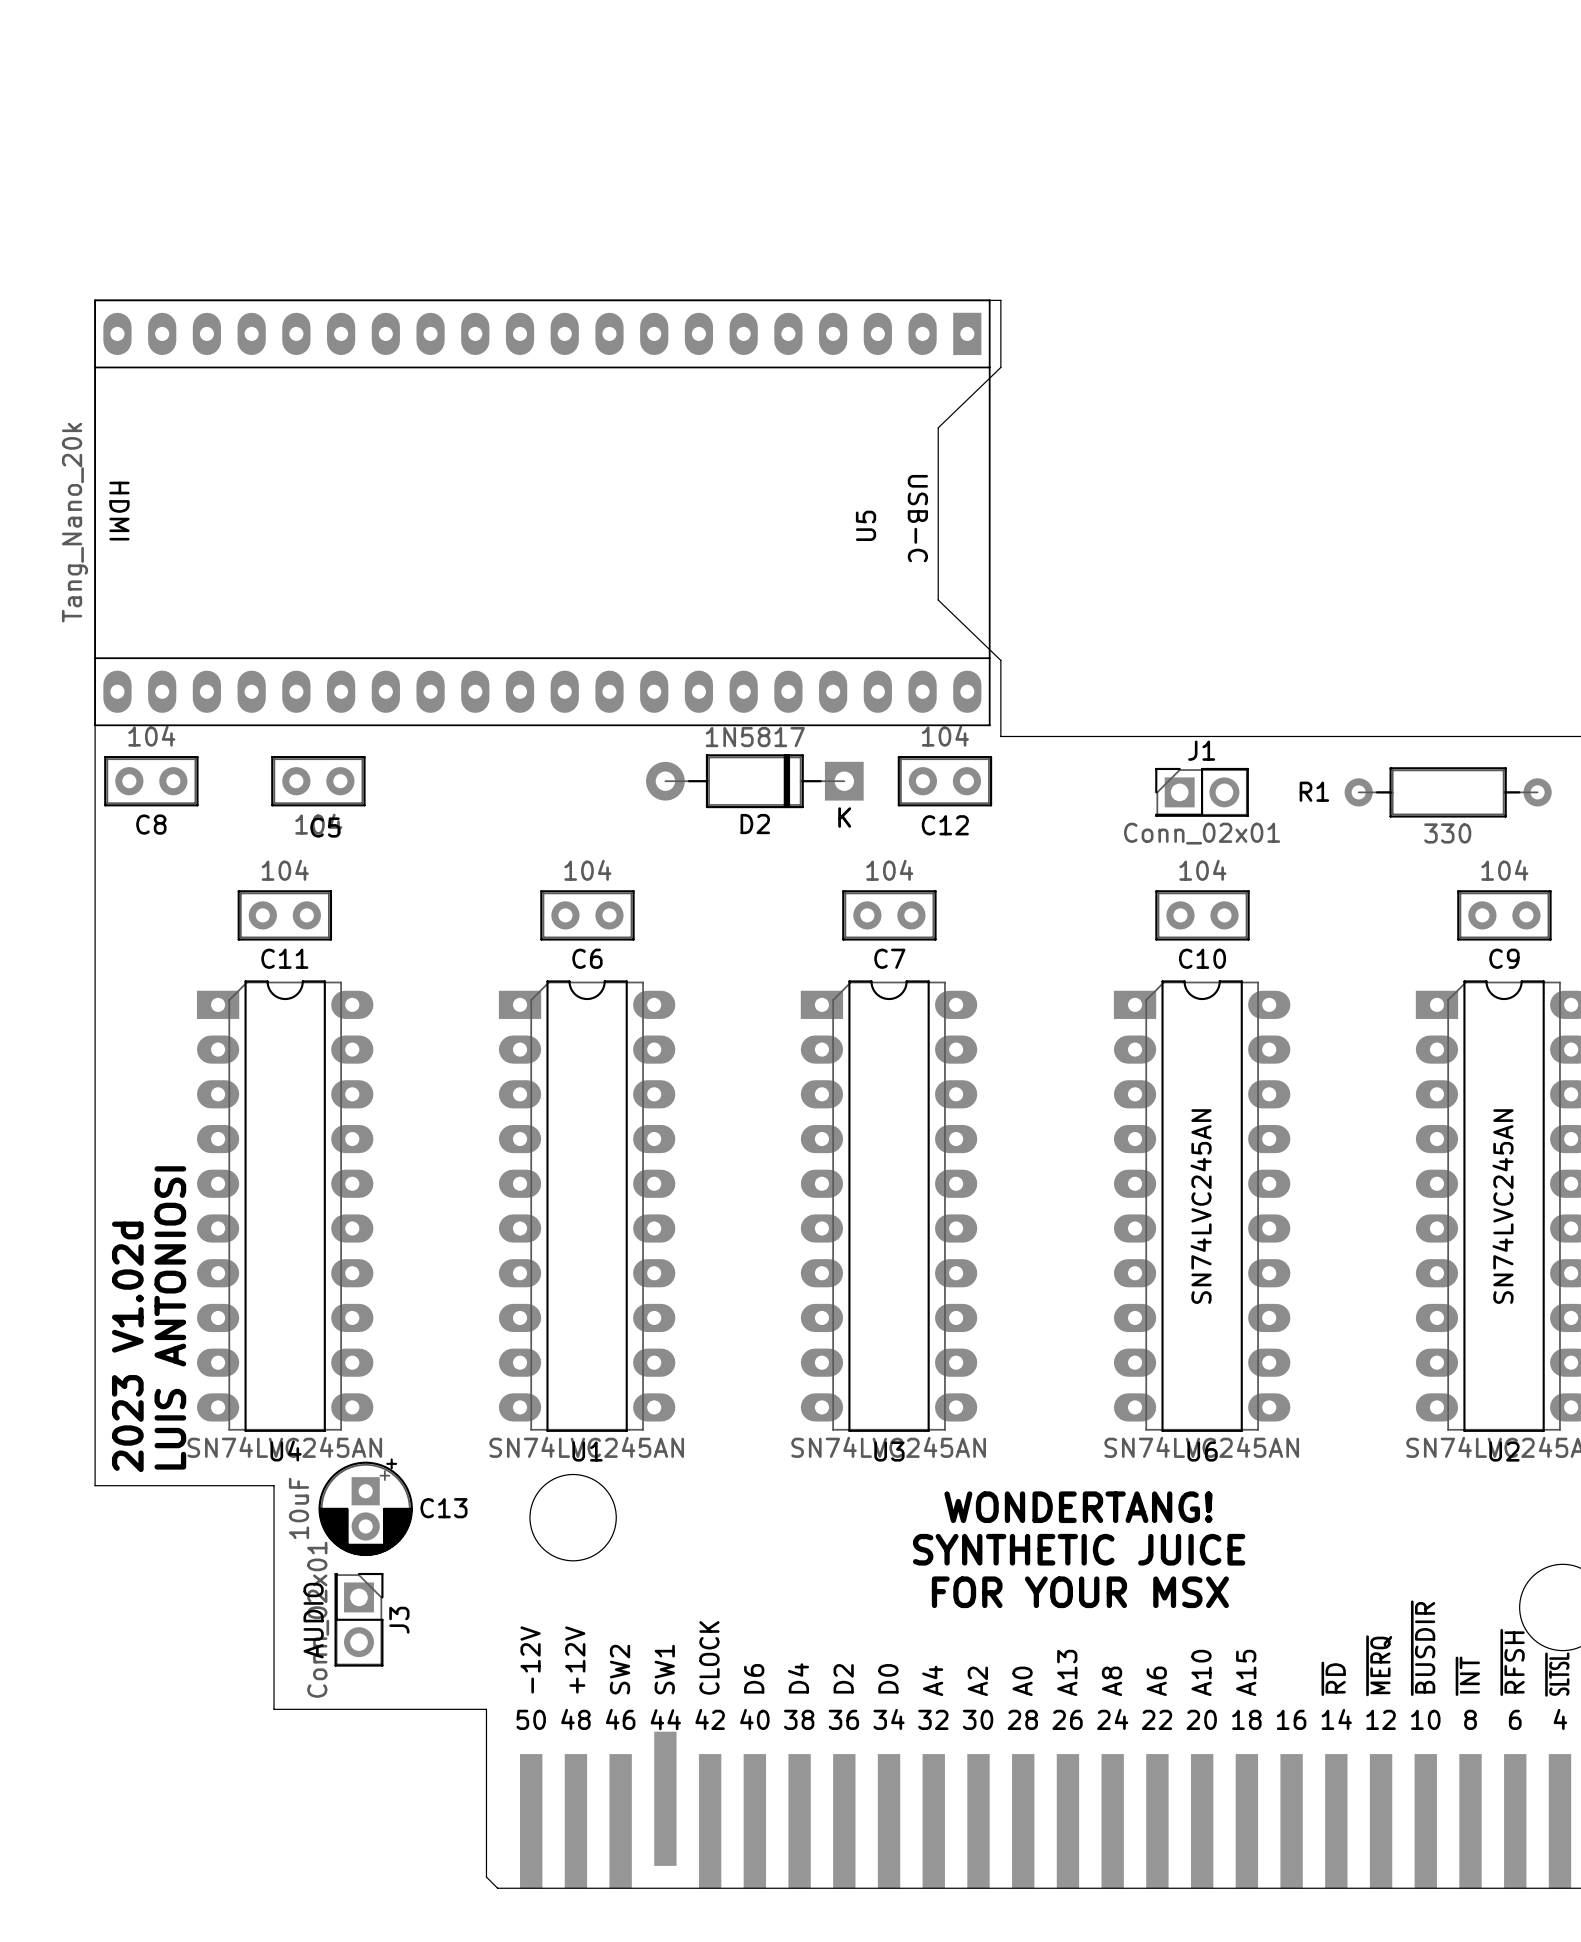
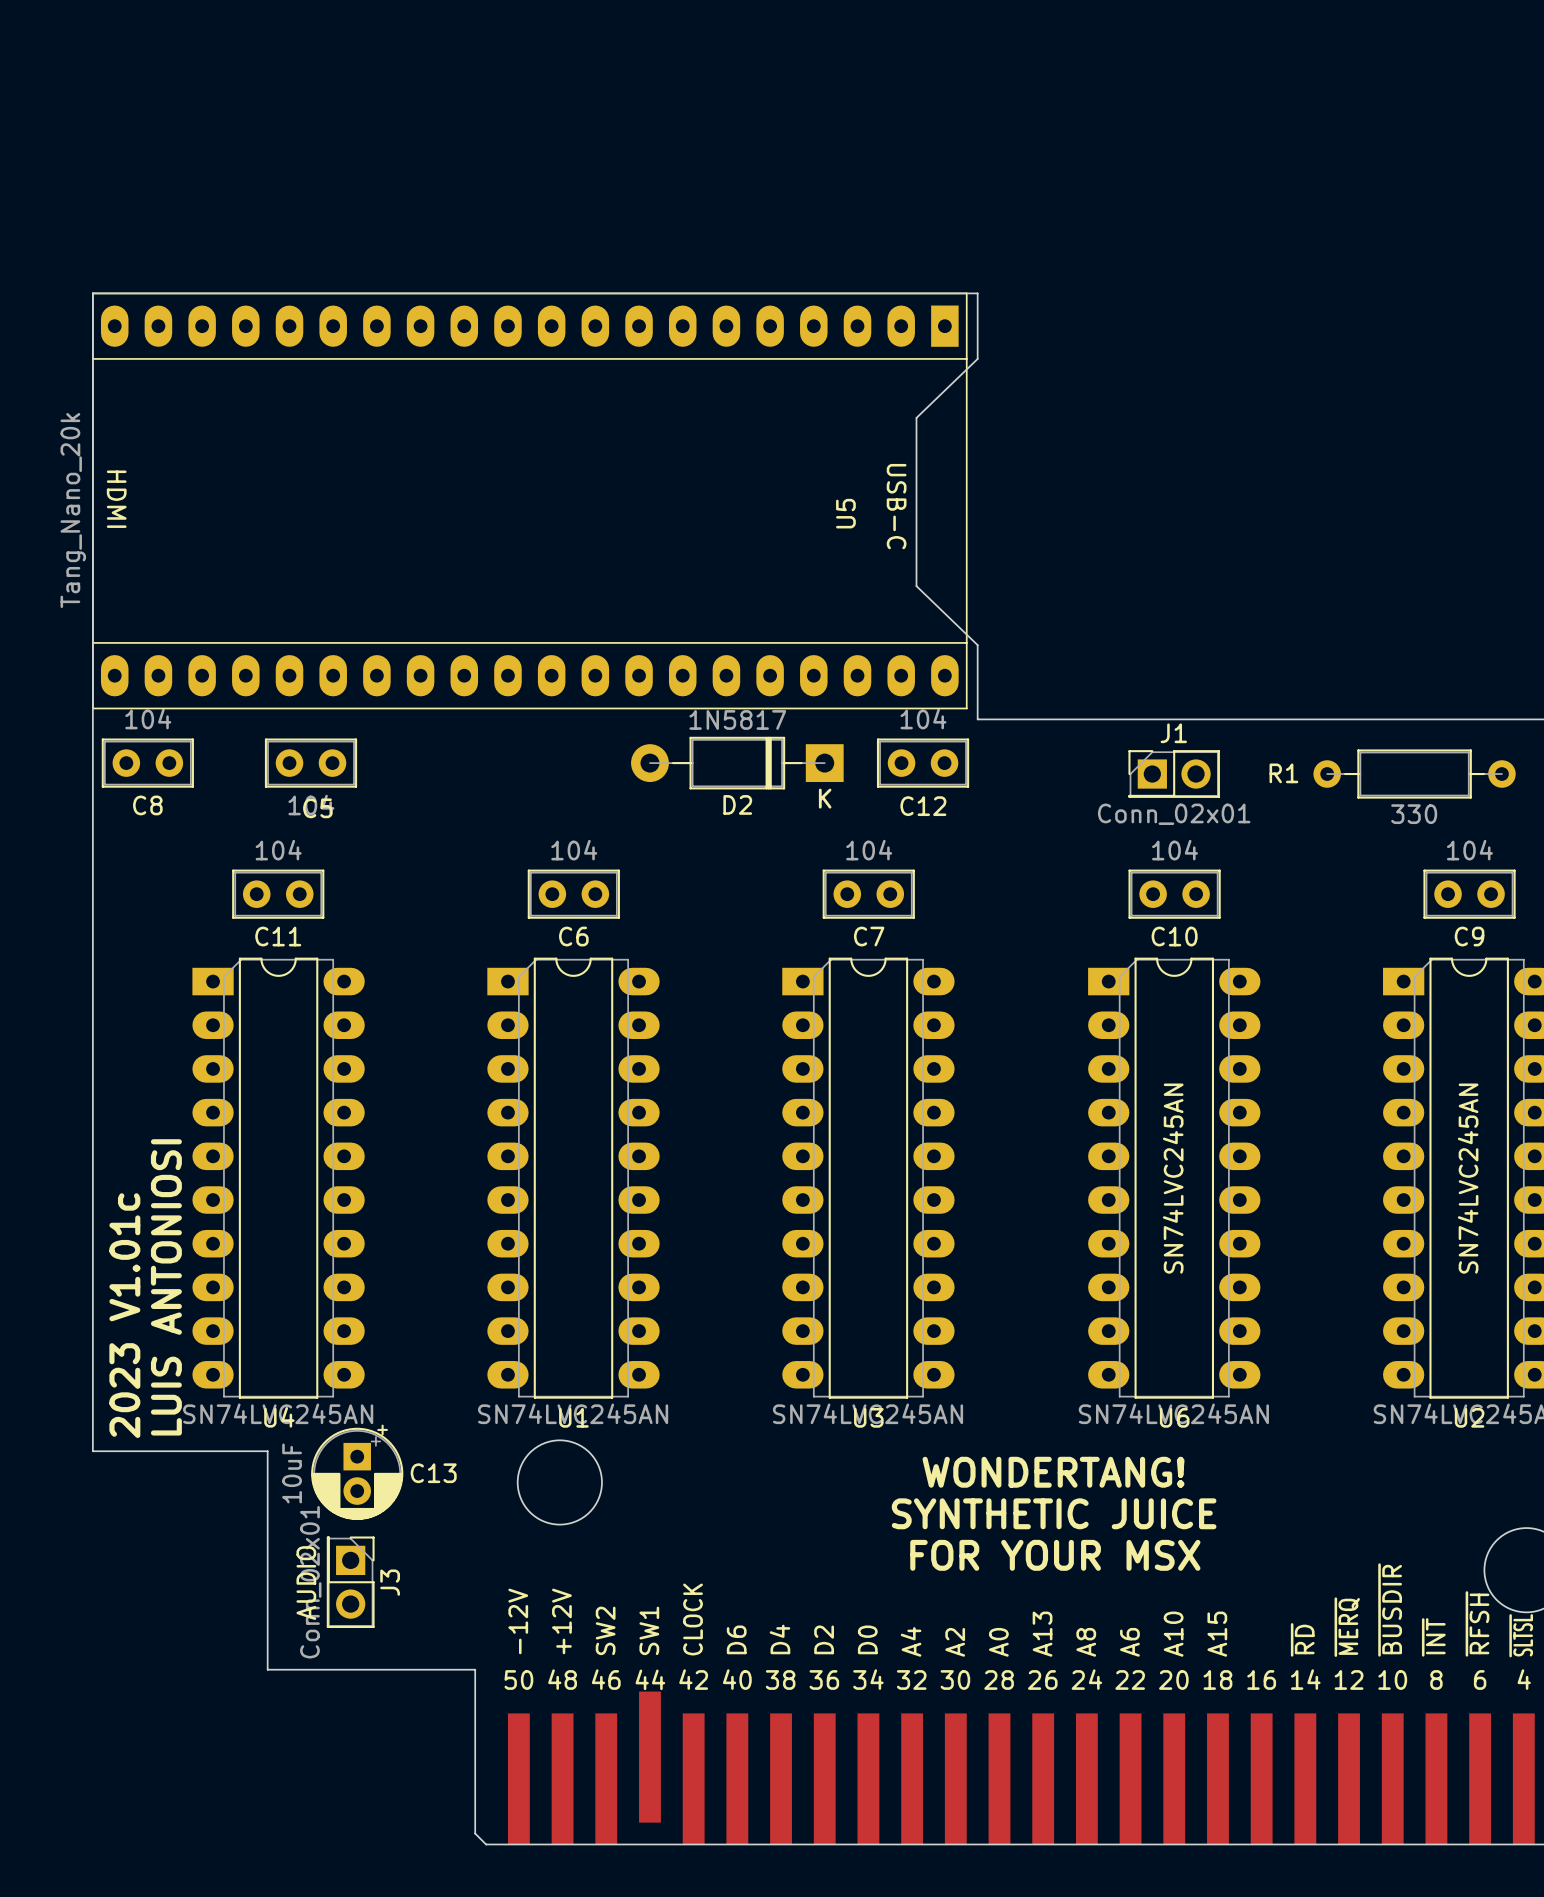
text: 2023 V1.02d (127, 1346) -> 2023 V1.01c (124, 1315)

